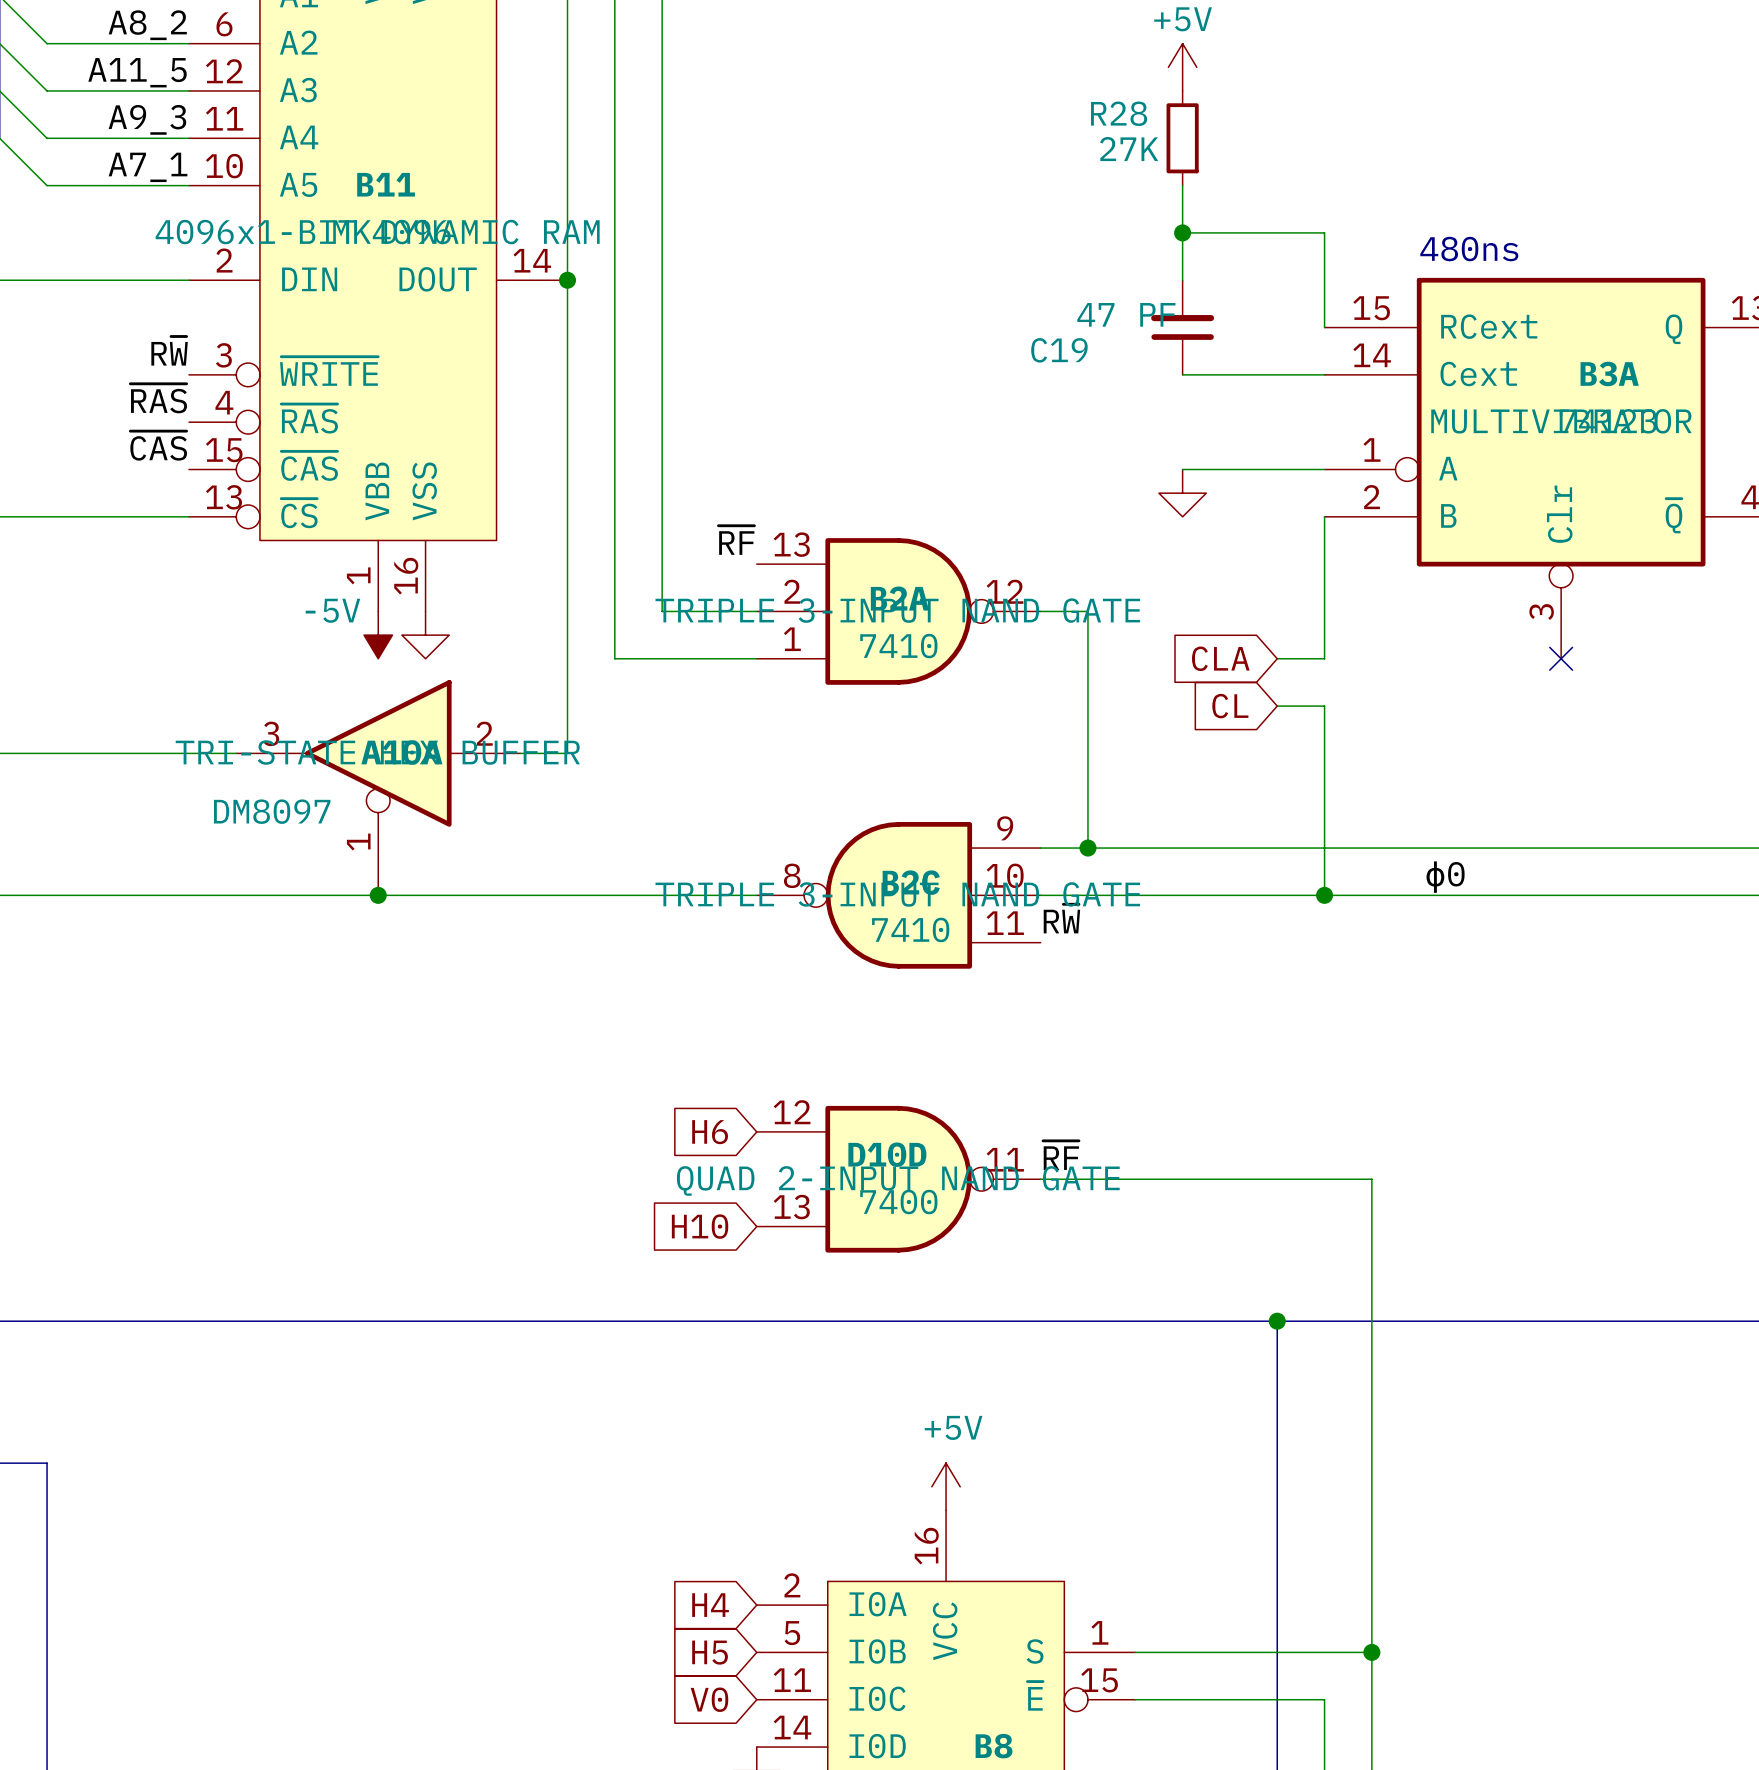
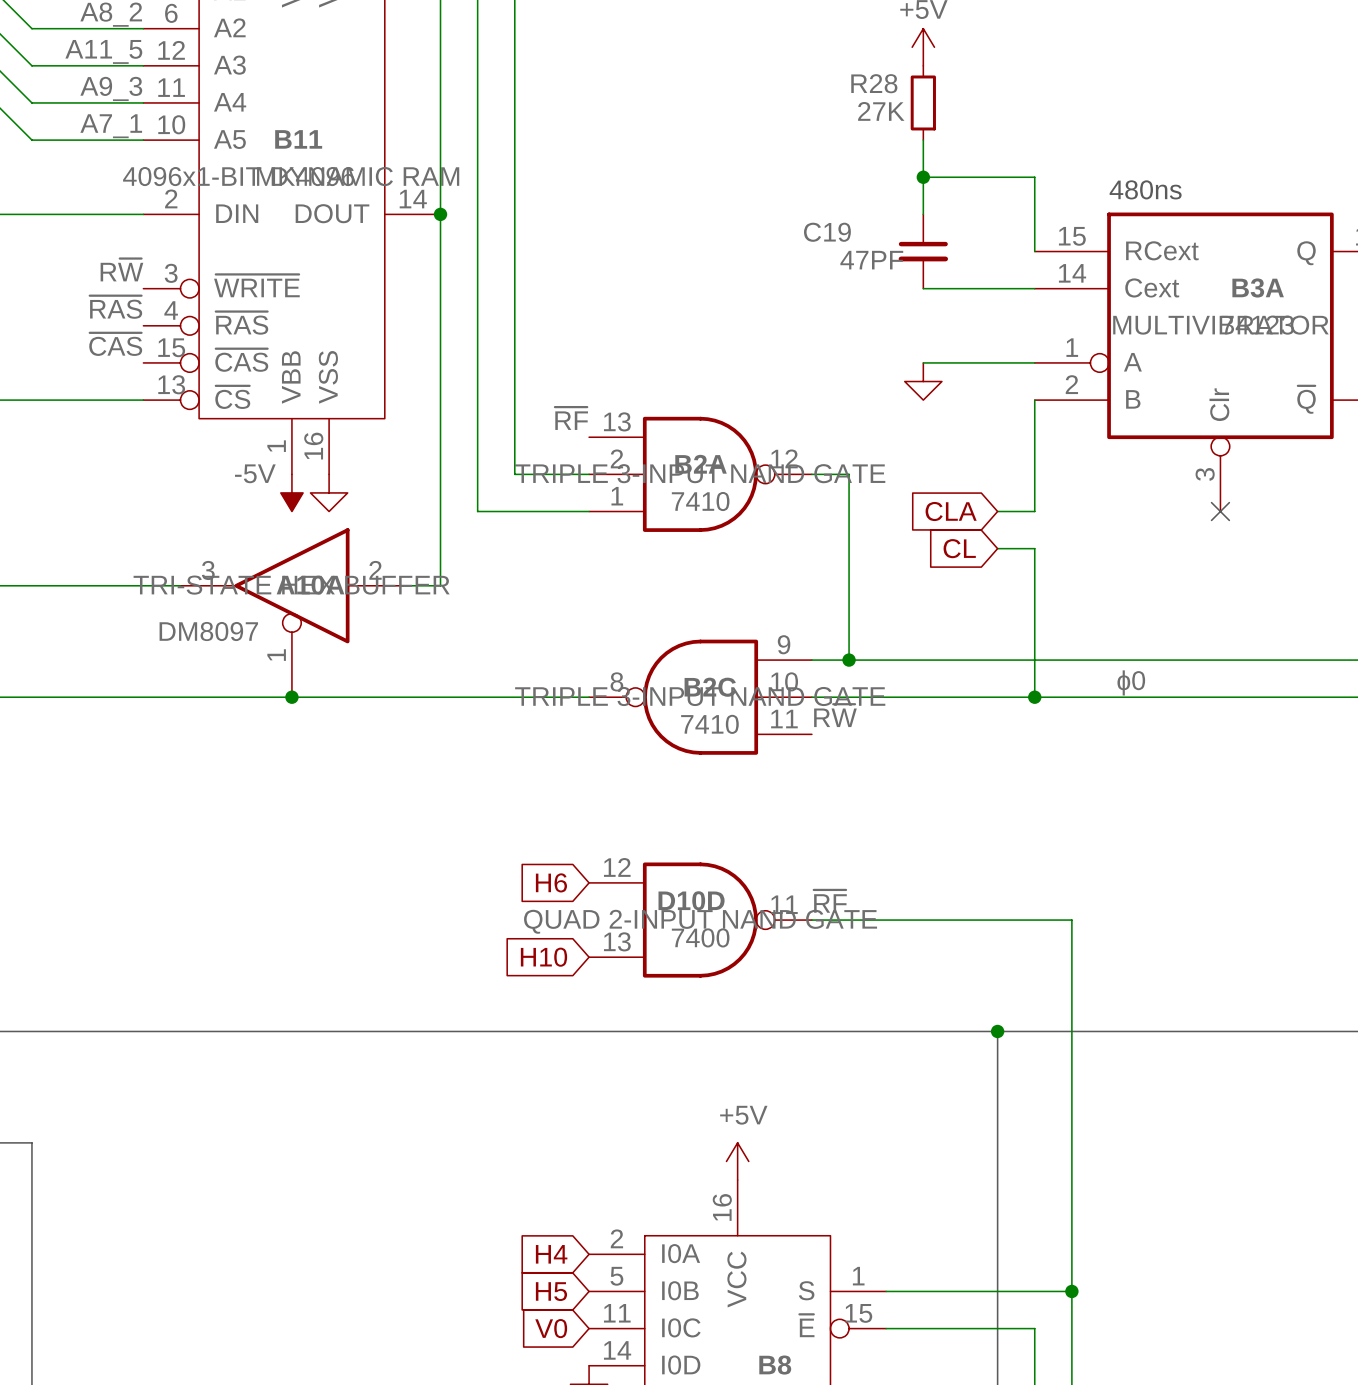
C19 value: 47 PF (1126, 314) -> 47PF (871, 260)
C19 rotation: 0° (1182, 327) -> 180° (923, 251)
C19 name position: C19 (1059, 350) -> C19 (827, 232)

